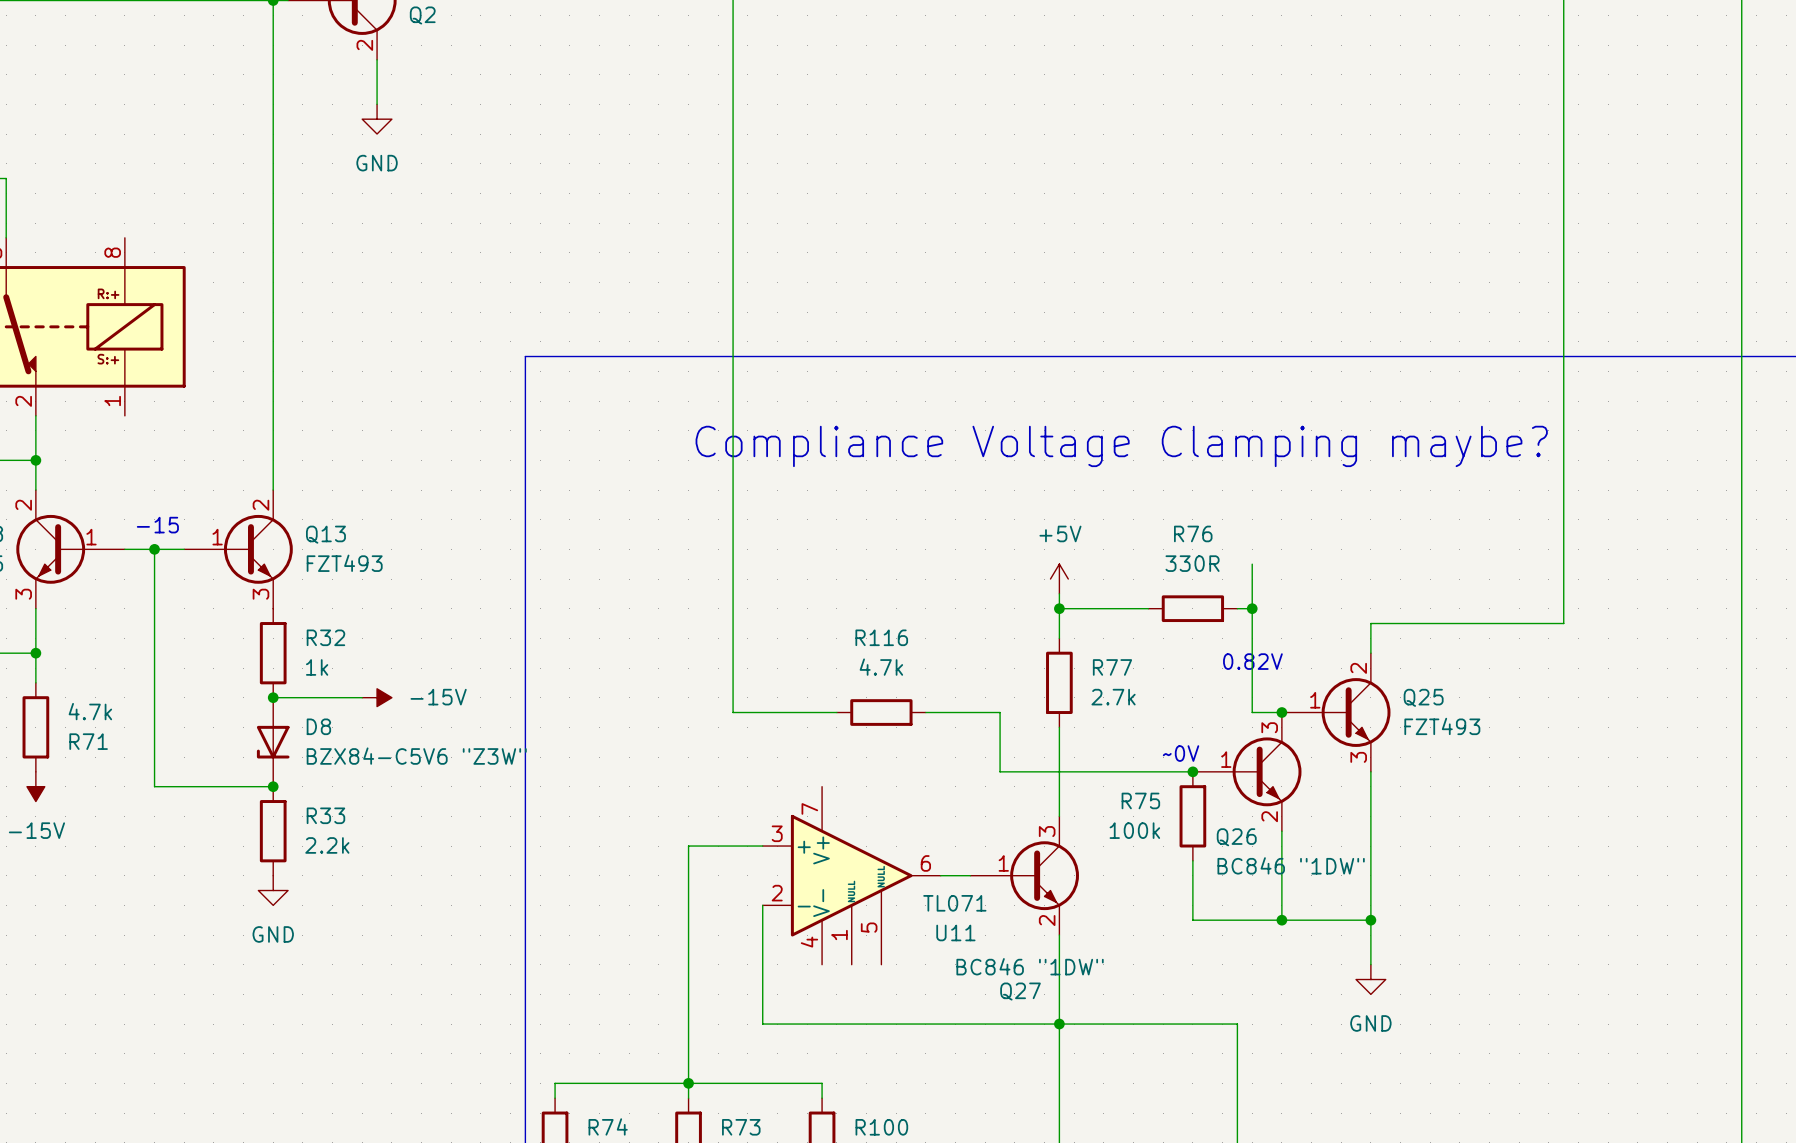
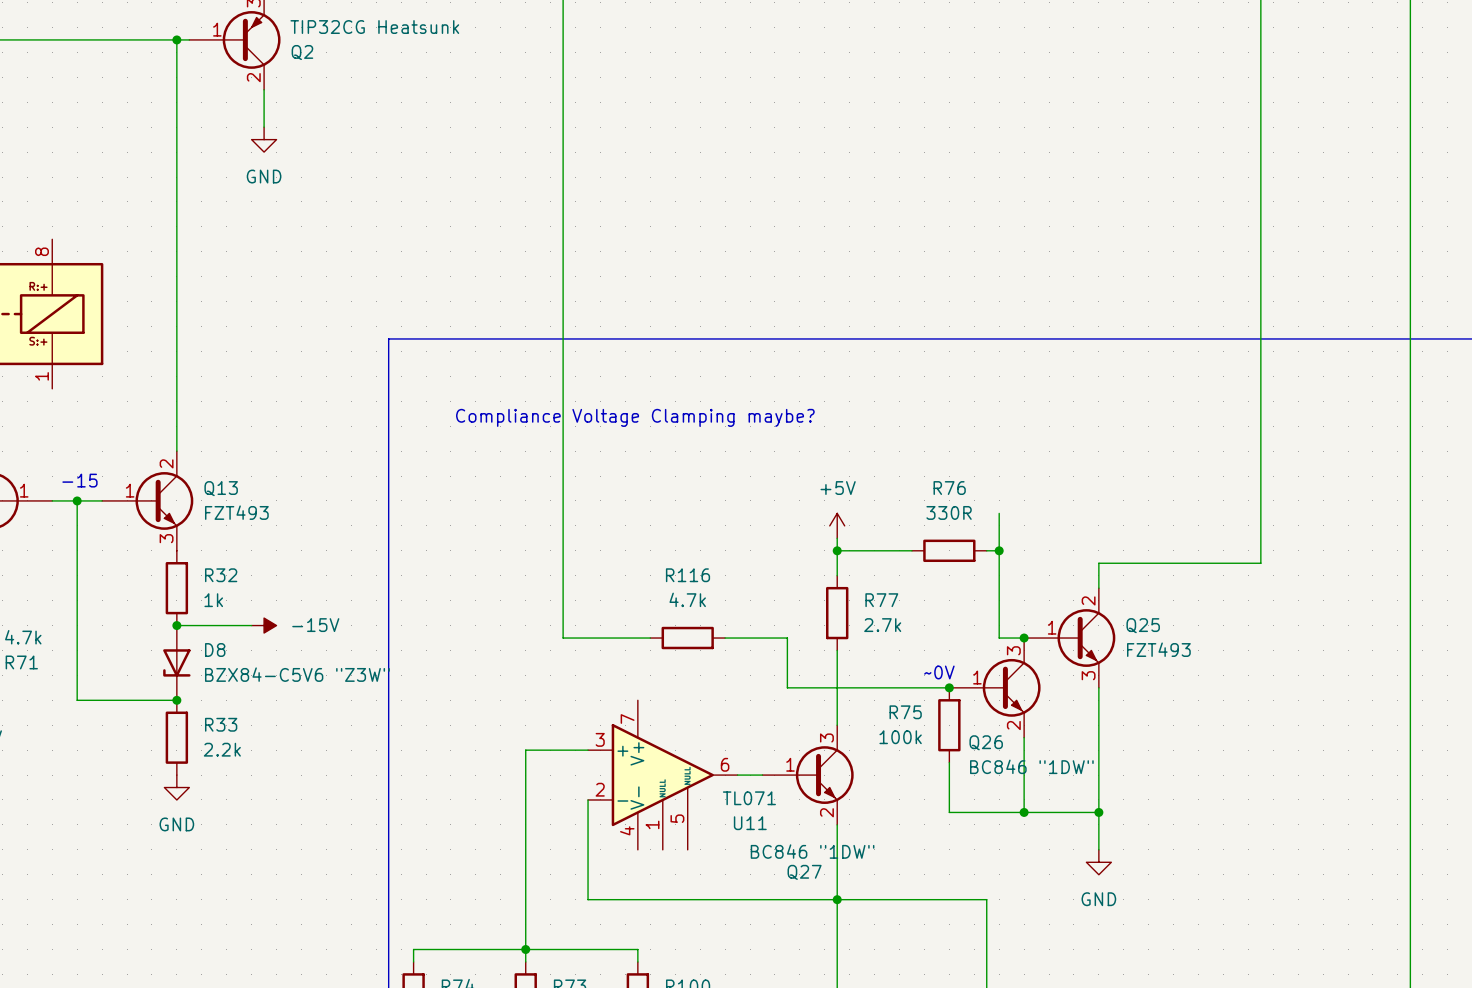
text: Compliance Voltage Clamping maybe? (1121, 446) -> none
text: none -> Compliance Voltage Clamping maybe? (635, 417)
text: 0.82V (1252, 661) -> none

